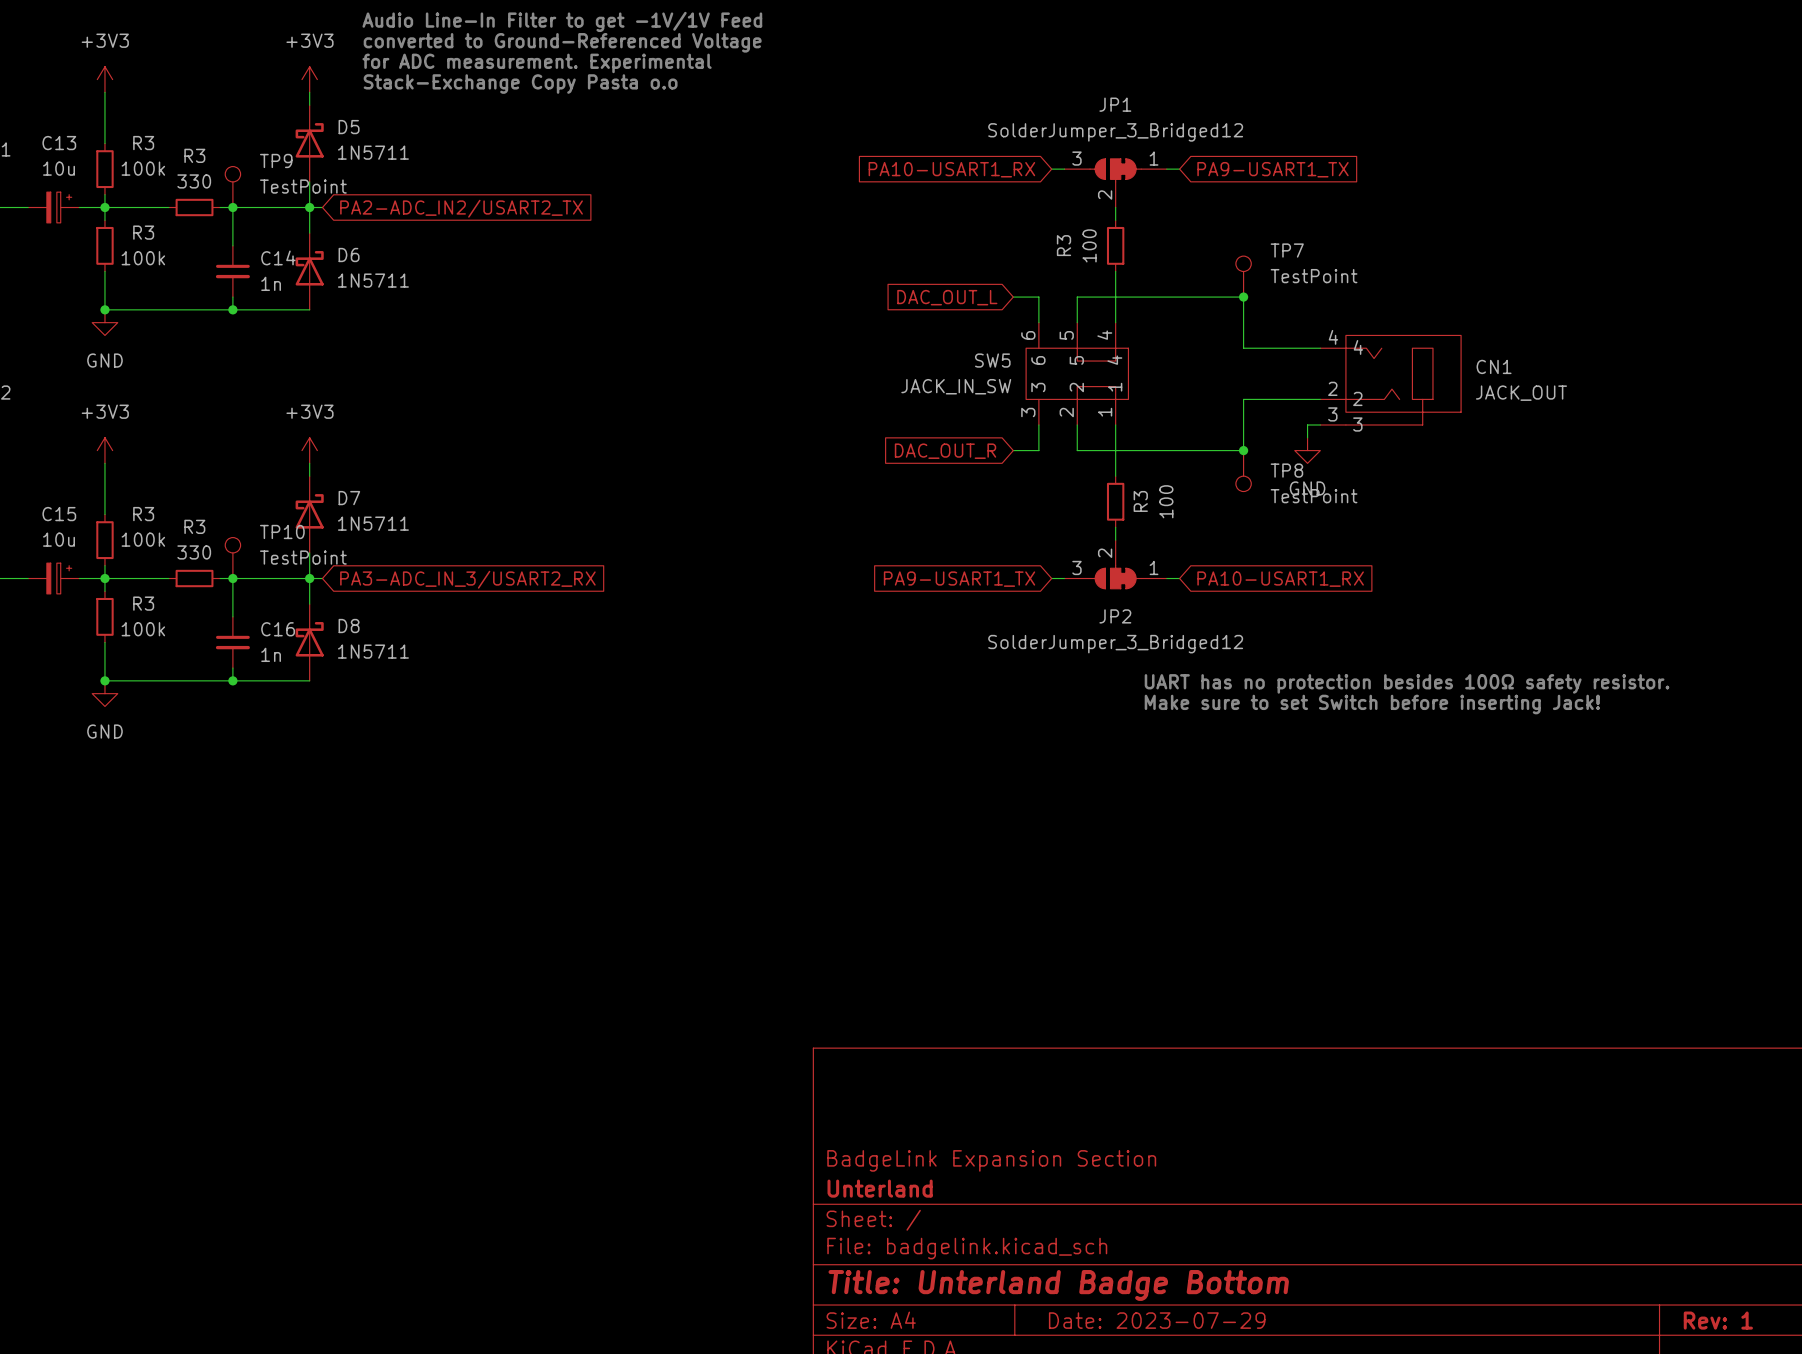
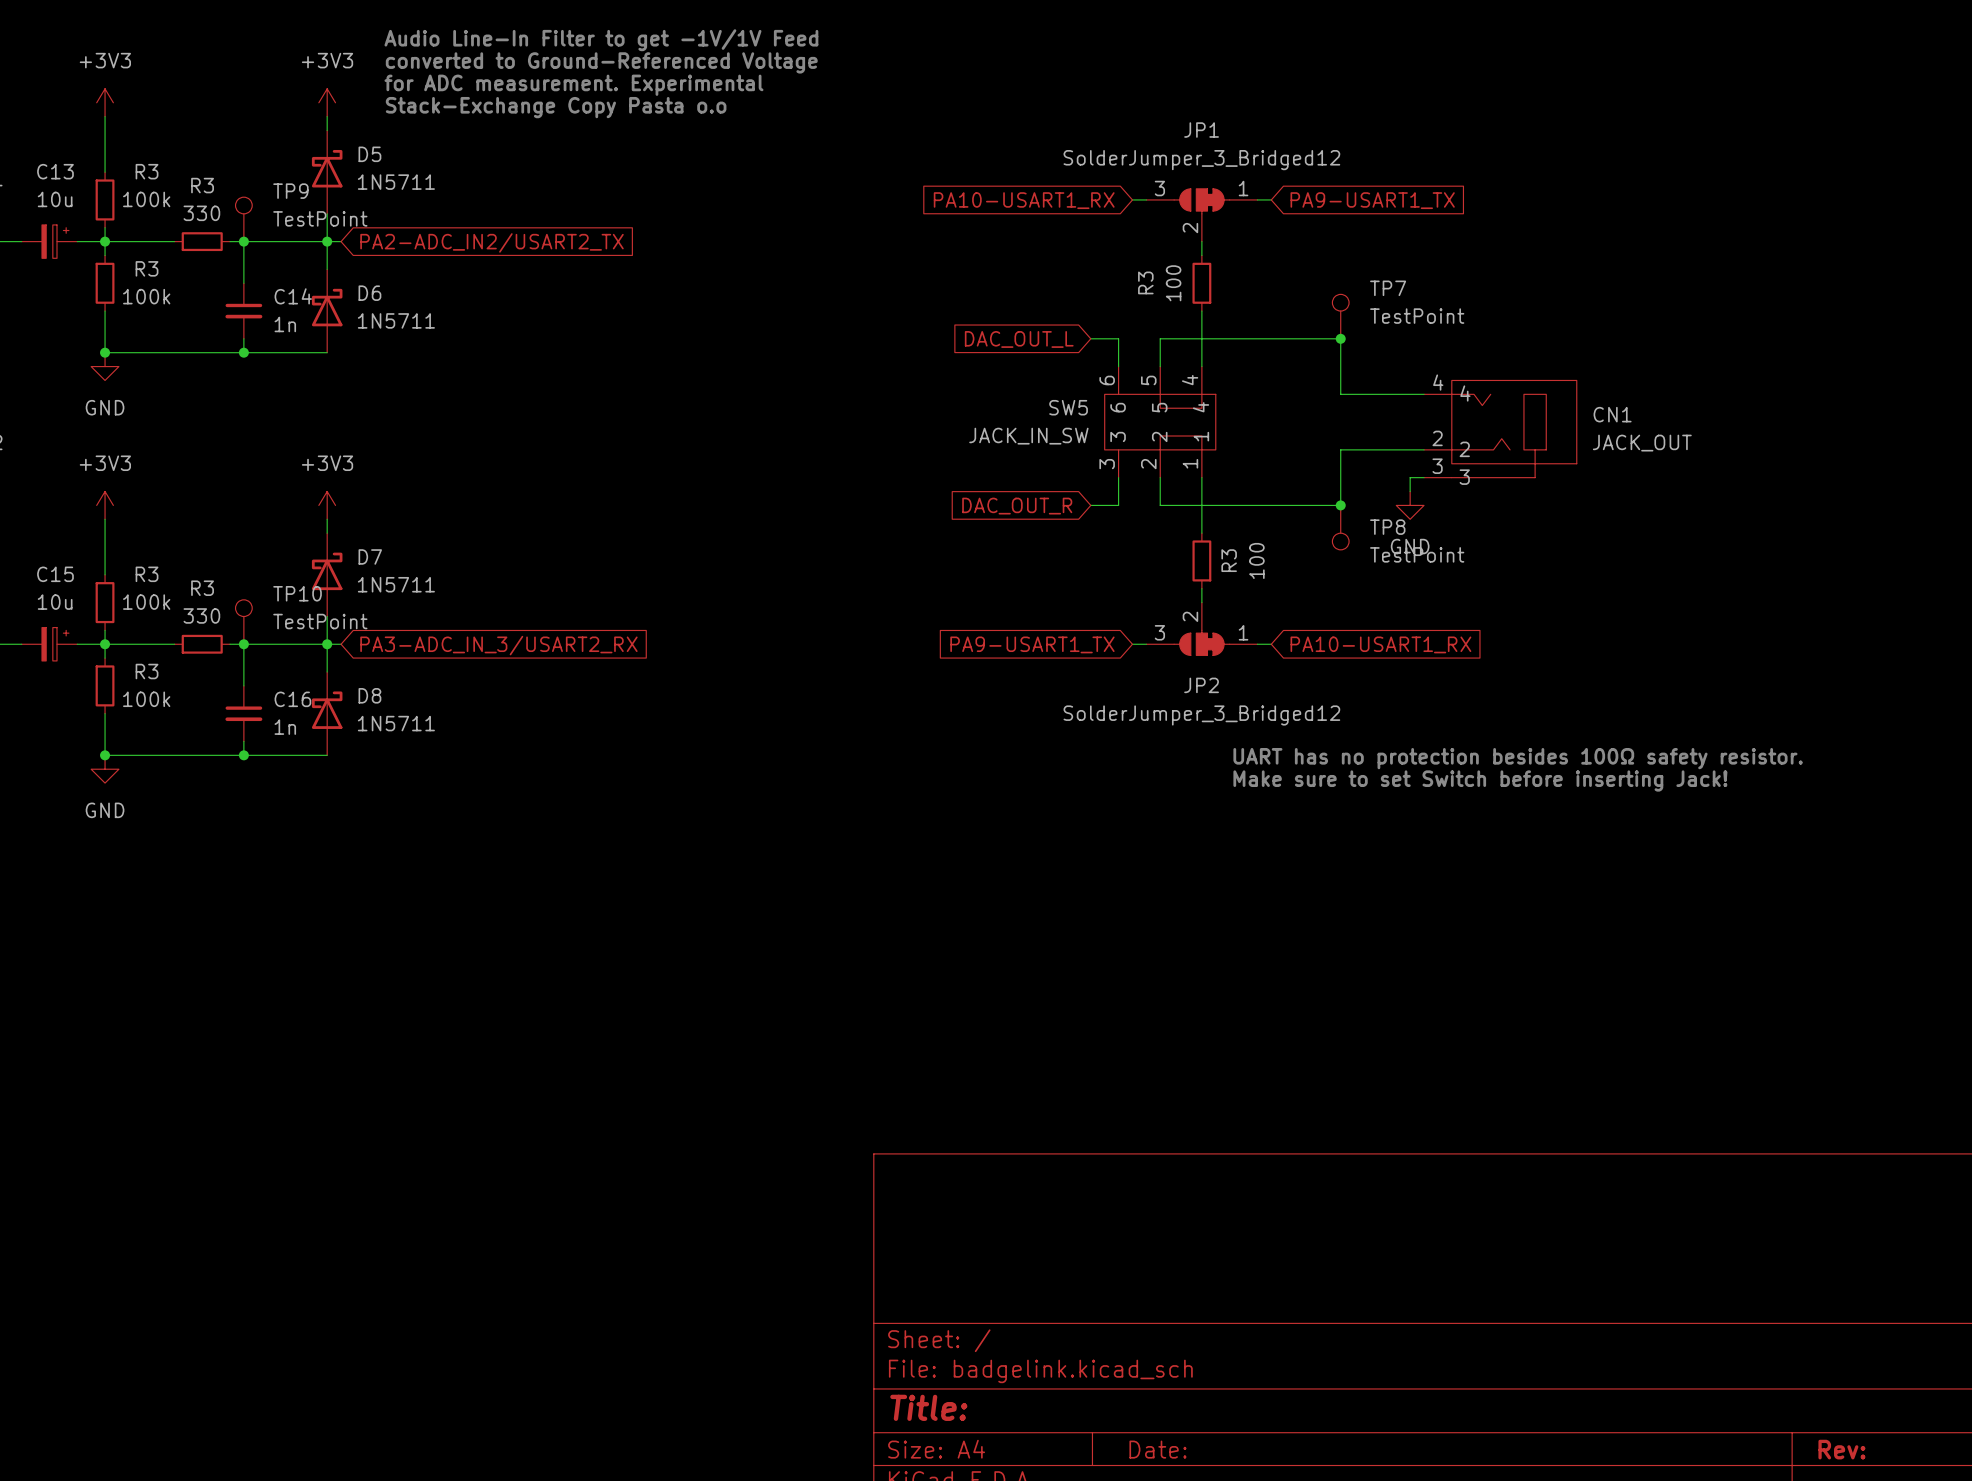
title block: BadgeLink Expansion Section (991, 1160) -> none
title block: Unterland (880, 1188) -> none
title block: Title: Unterland Badge Bottom (1058, 1285) -> Title: (928, 1407)
title block: Date: 2023-07-29 (1157, 1320) -> Date: (1157, 1449)
title block: Rev: 1 (1718, 1320) -> Rev: (1841, 1449)

